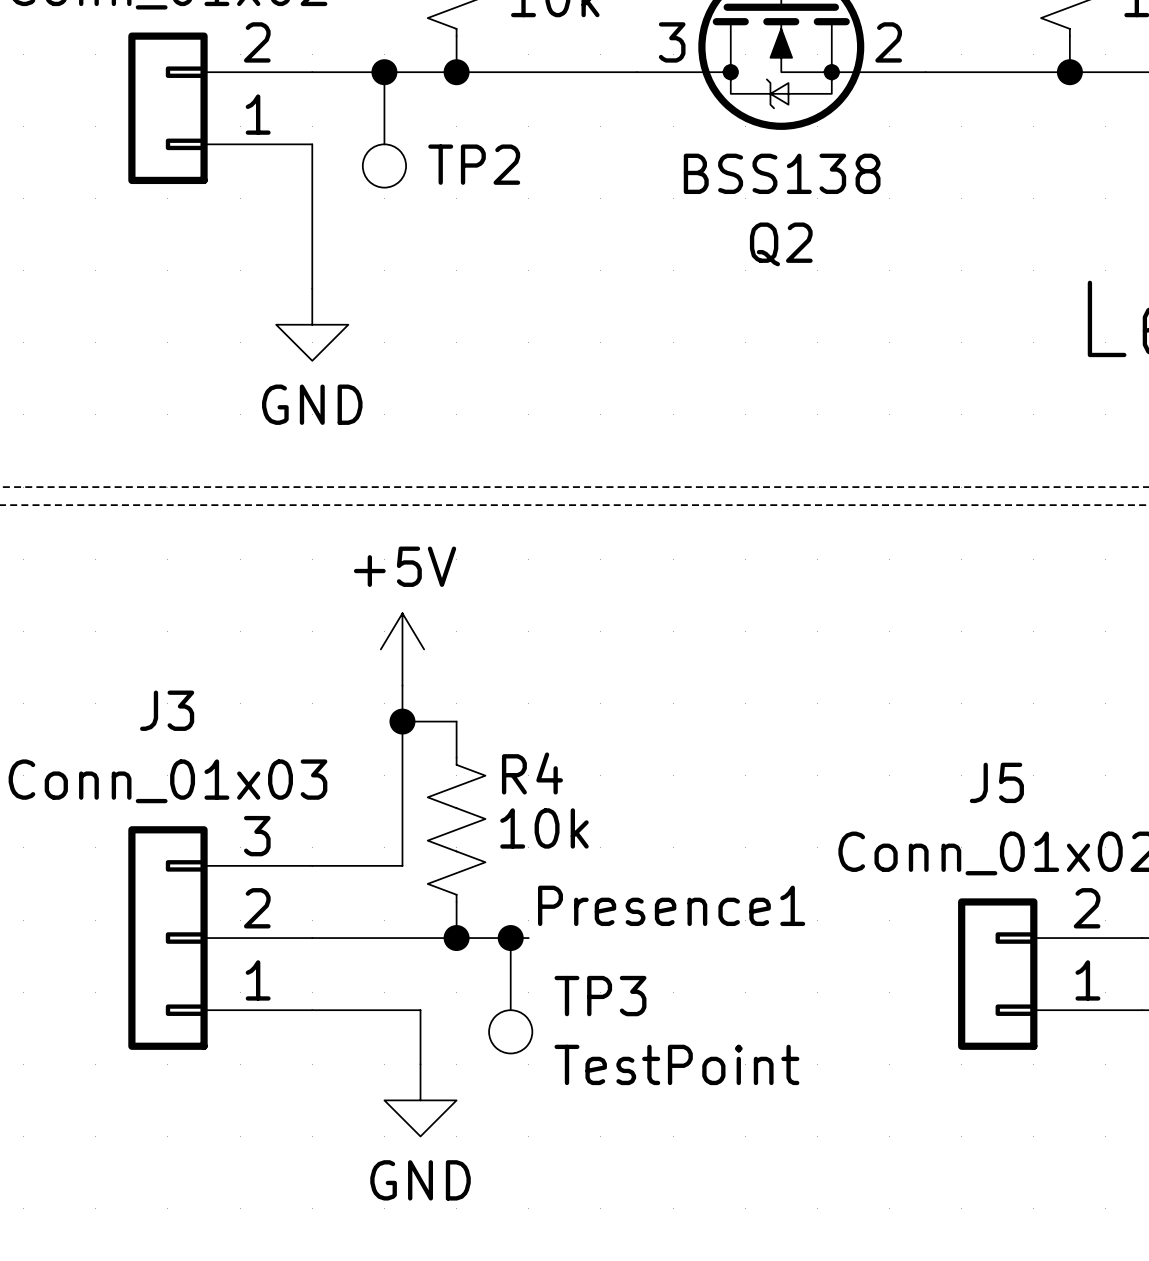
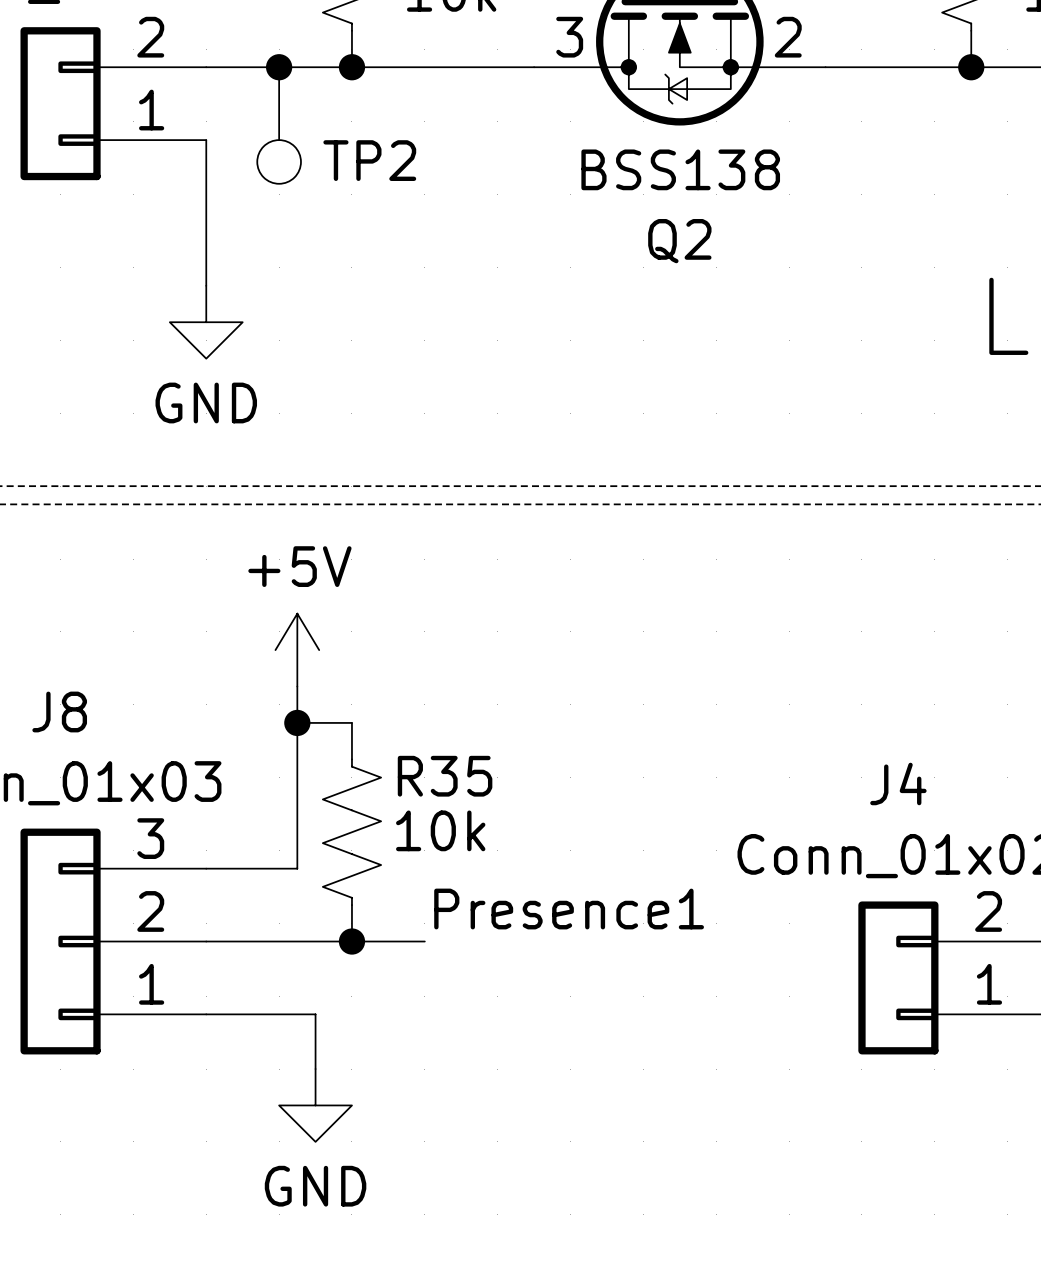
J3 name: J3 (167, 710) -> J8 (59, 711)
R4 name: R4 (532, 773) -> R35 (445, 776)
J5 name: J5 (996, 782) -> J4 (898, 783)
junction: (510, 938) -> none
TP3: TestPoint (510, 995) -> none

